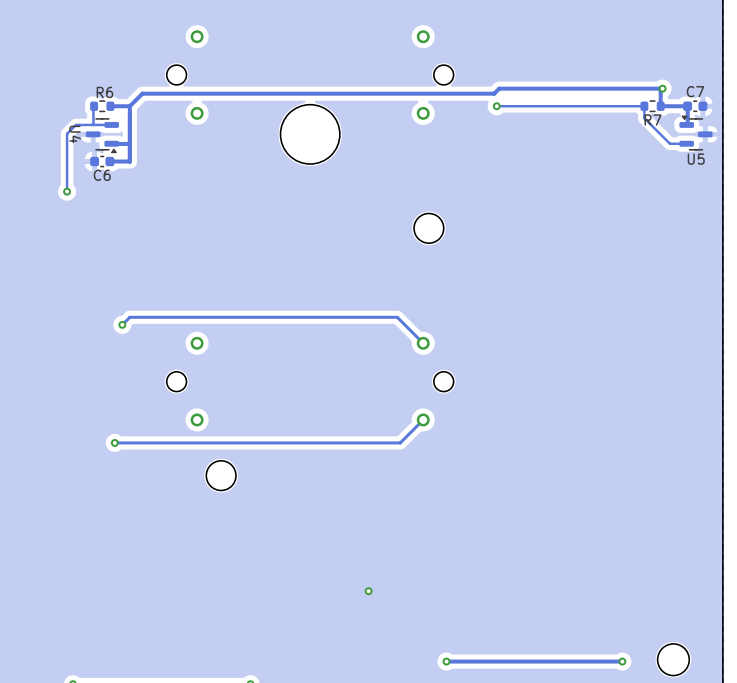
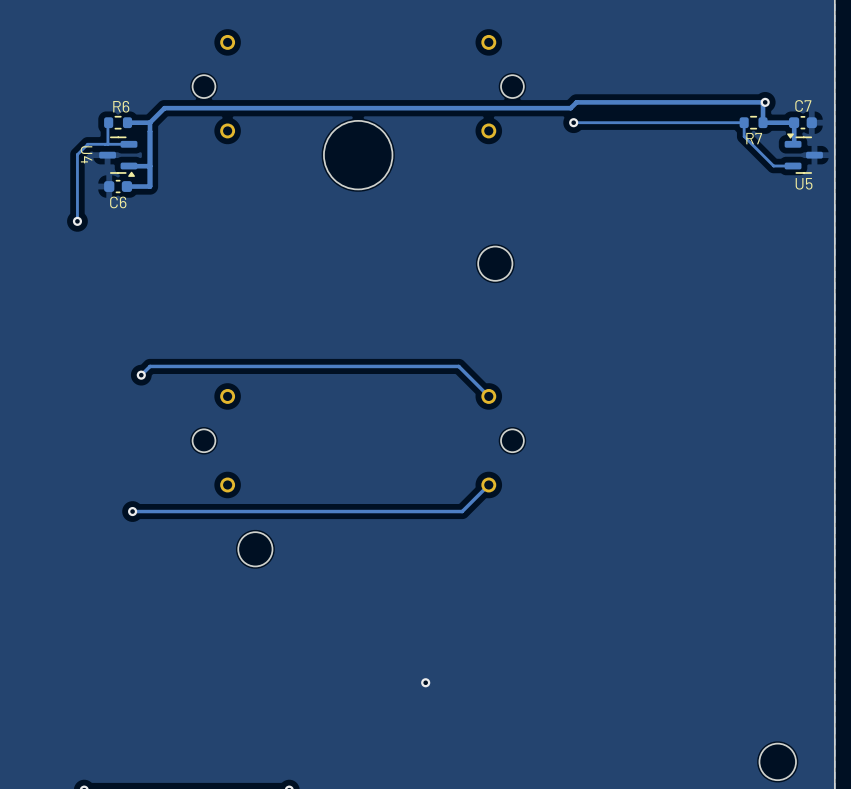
via: (446, 661) -> none
track: (622, 661) (446, 661) -> none
via: (622, 661) -> none

